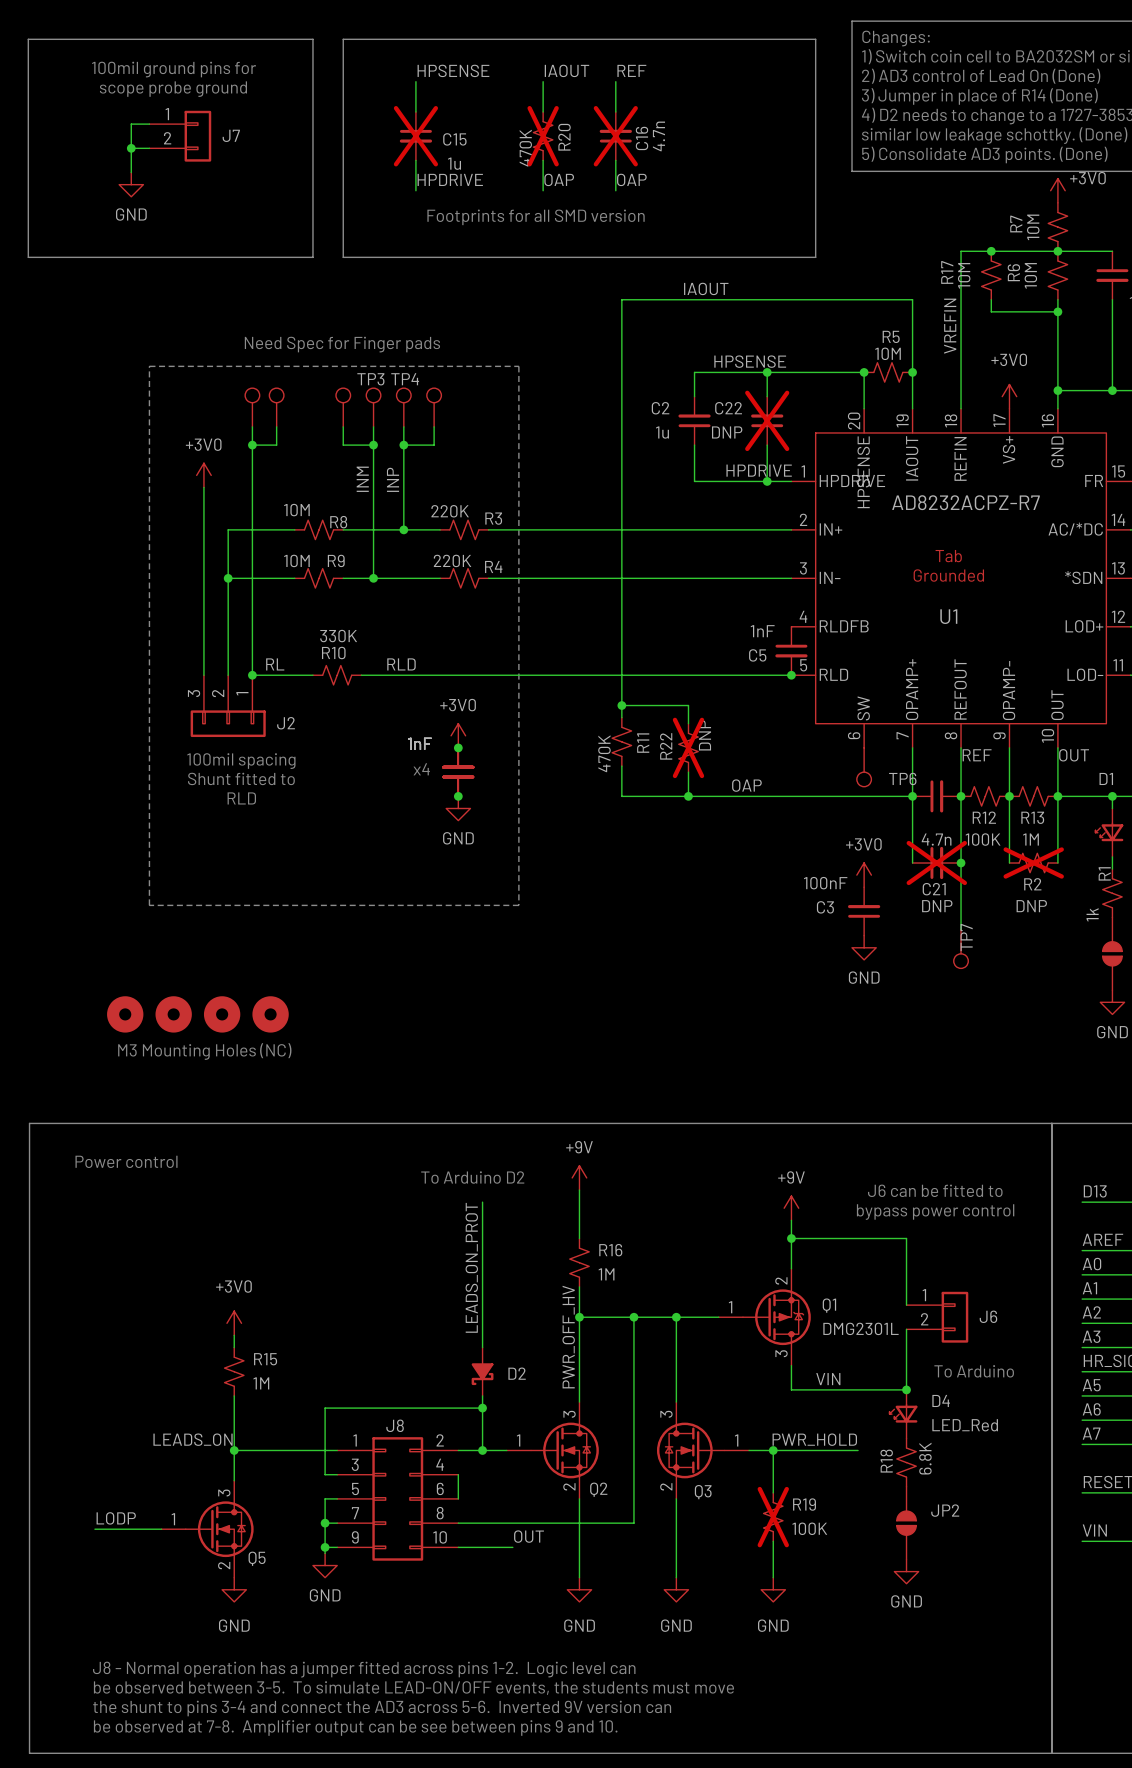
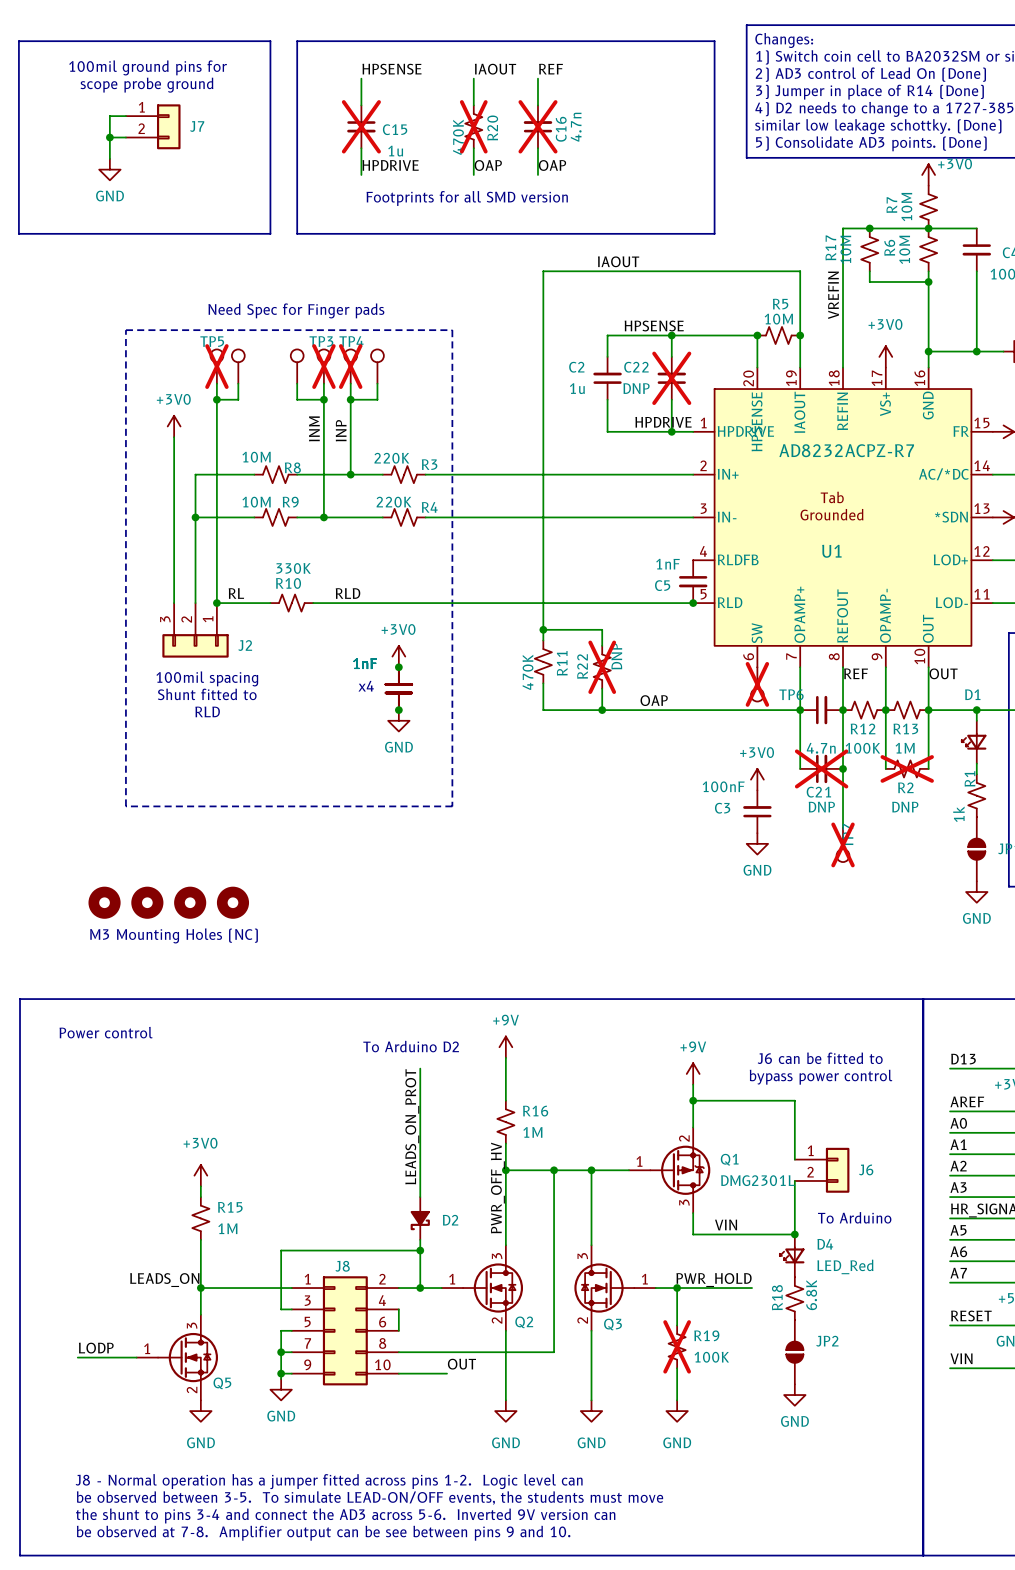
TP5 name: none -> TP5 (212, 341)
TP5 do-not-place cross: none -> (216, 366)
TP3 do-not-place cross: none -> (323, 366)
TP4 do-not-place cross: none -> (350, 366)
TP6 do-not-place cross: none -> (757, 684)
TP7 do-not-place cross: none -> (843, 844)

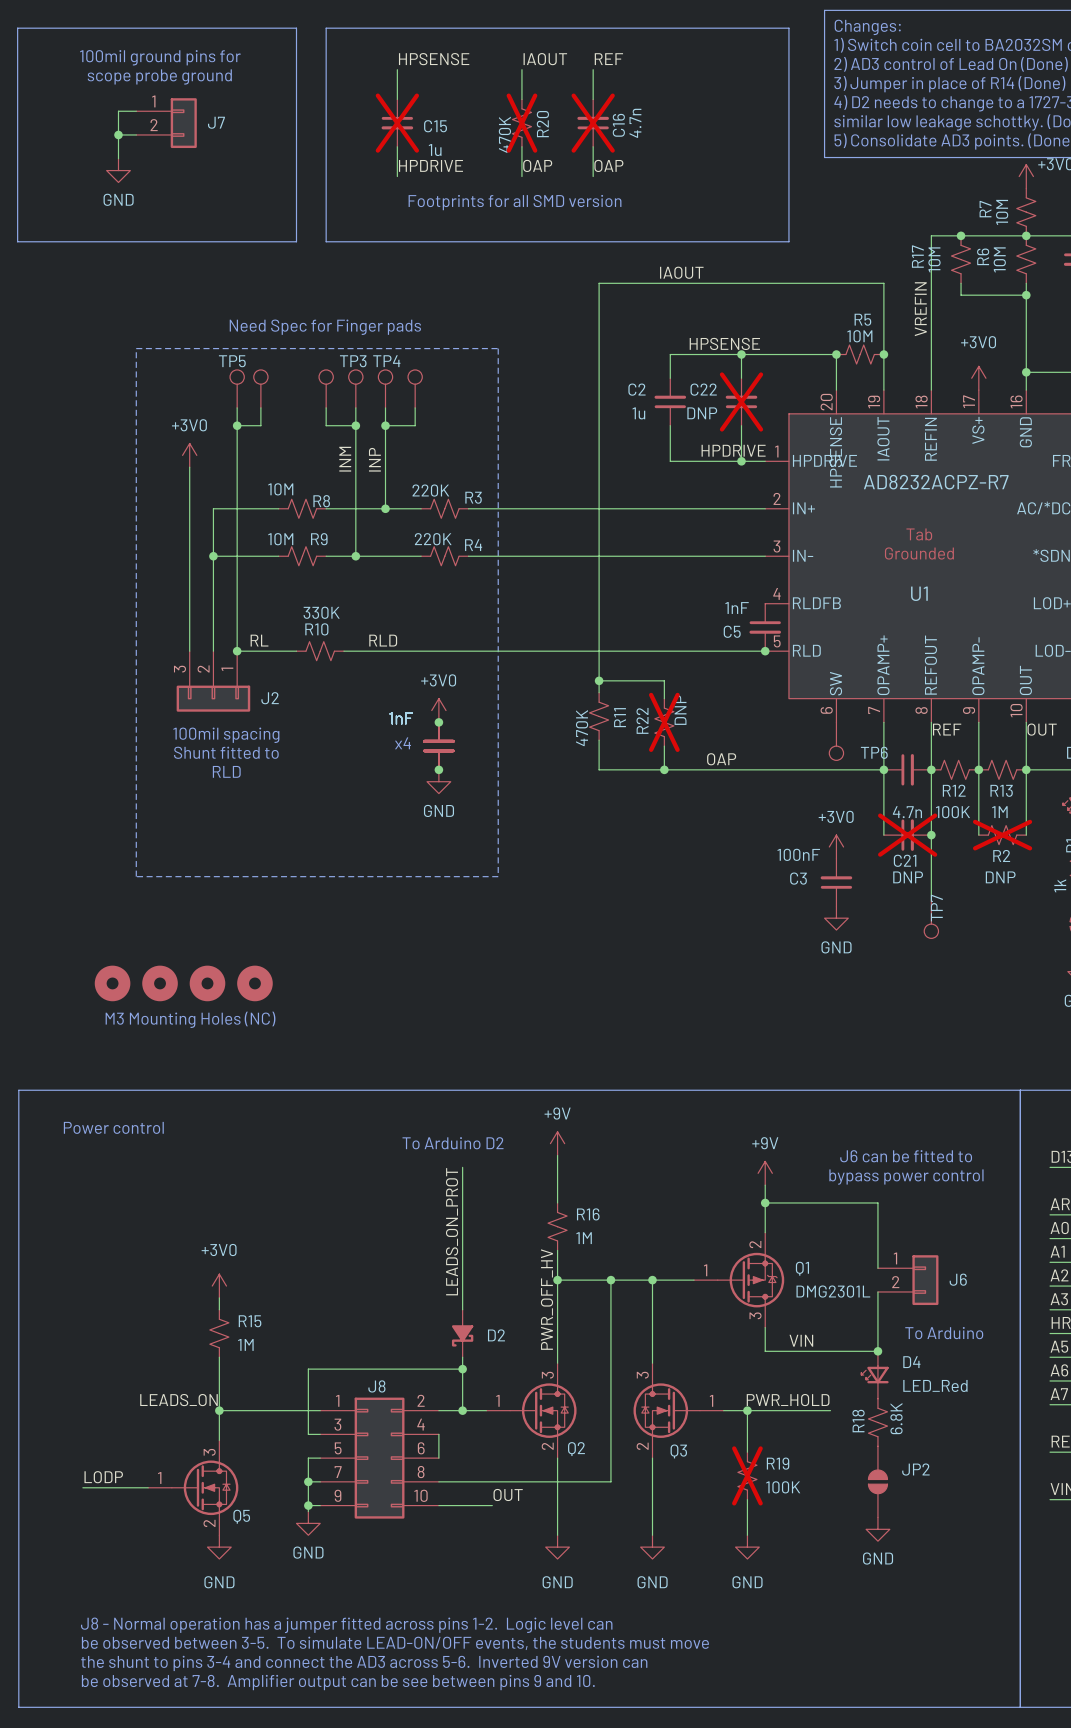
TP5 do-not-place cross: (216, 366) -> none
TP3 do-not-place cross: (323, 366) -> none
TP4 do-not-place cross: (350, 366) -> none
TP6 do-not-place cross: (757, 684) -> none
TP7 do-not-place cross: (843, 844) -> none

